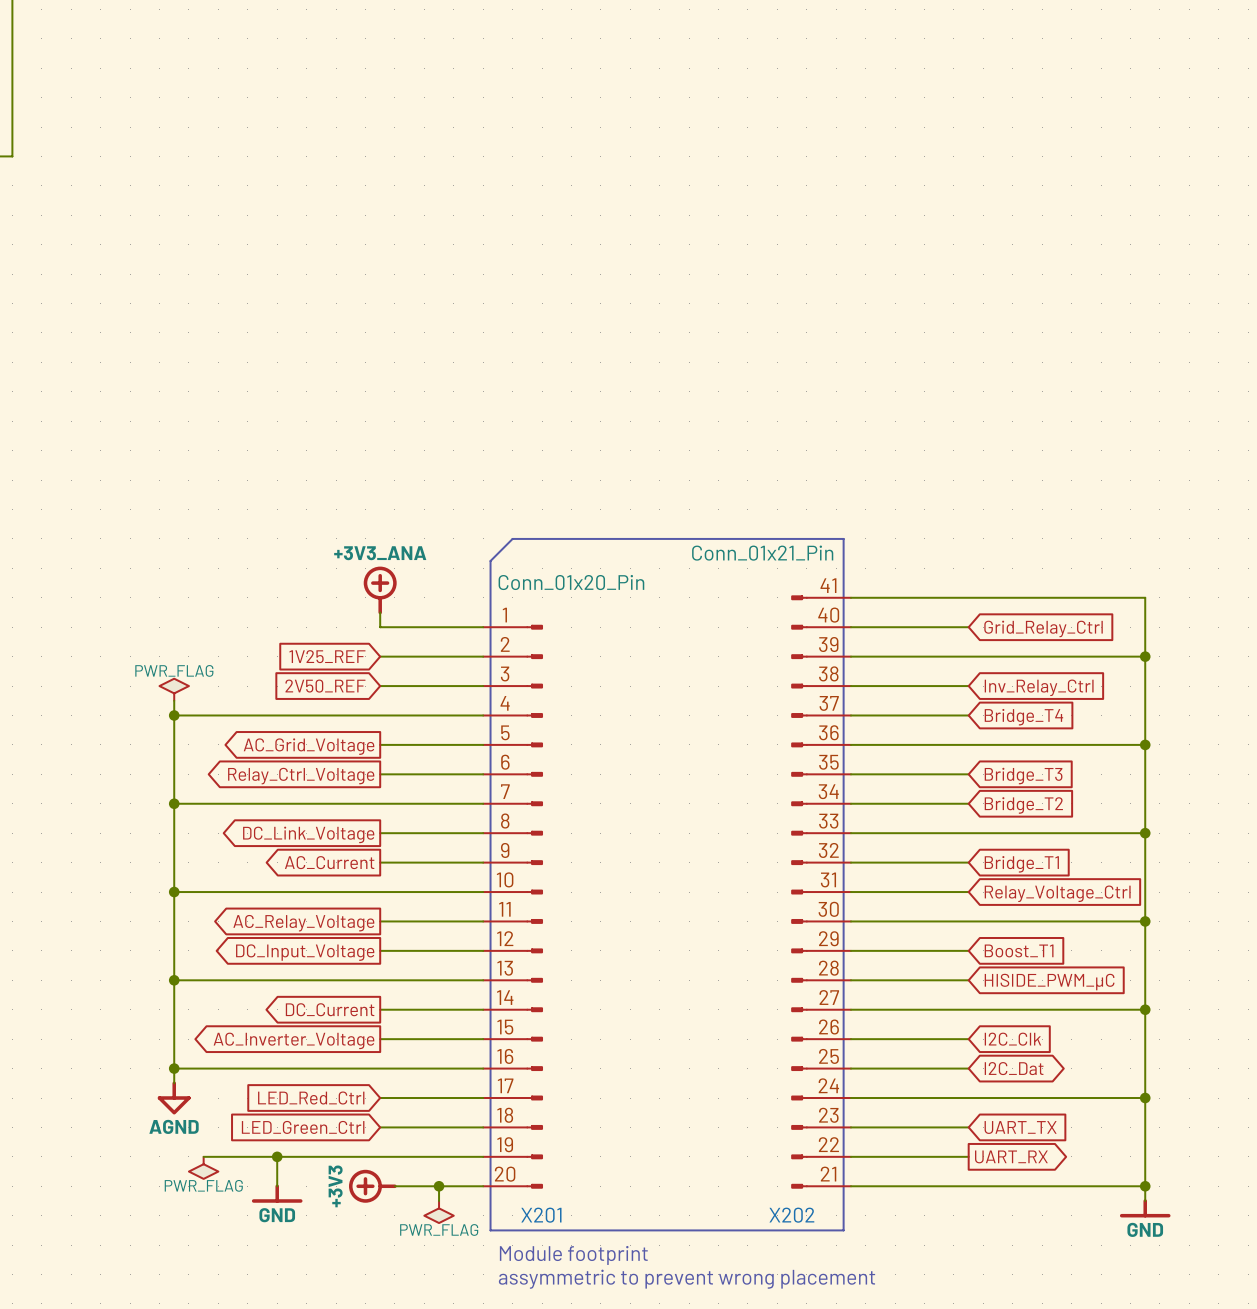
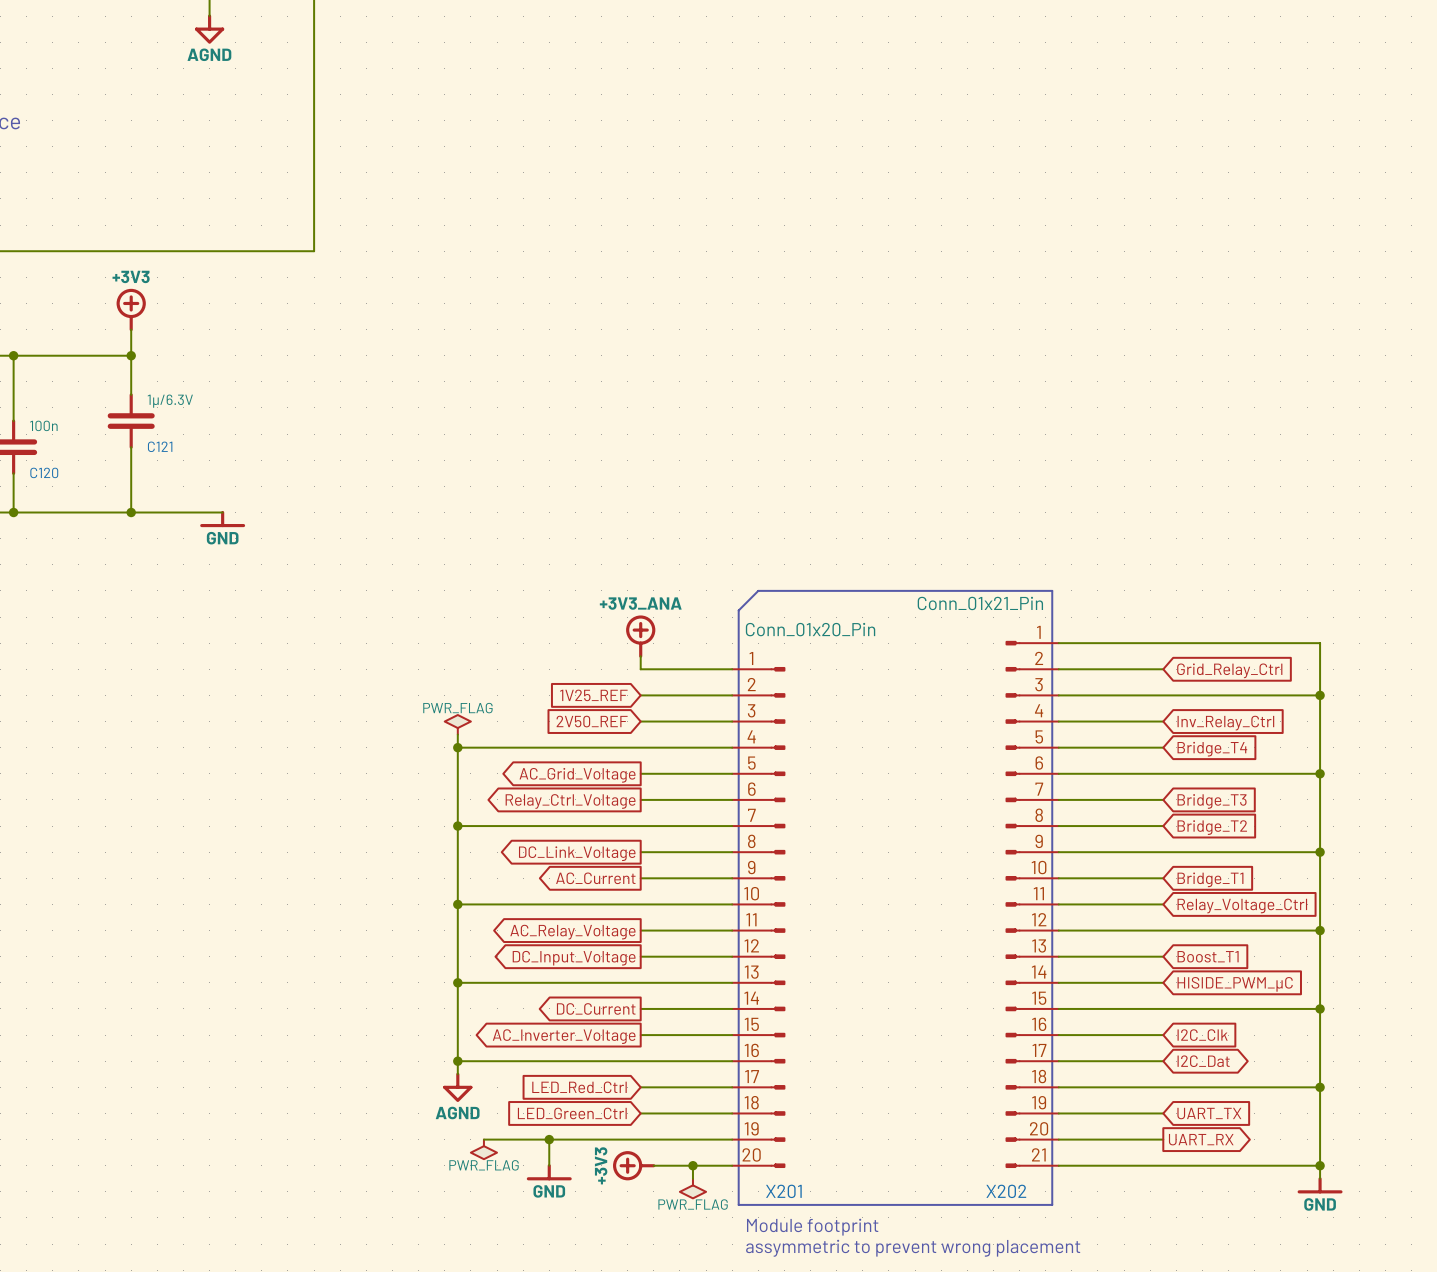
X202 symbol: [791, 595, 851, 1189] -> [1005, 641, 1059, 1168]

